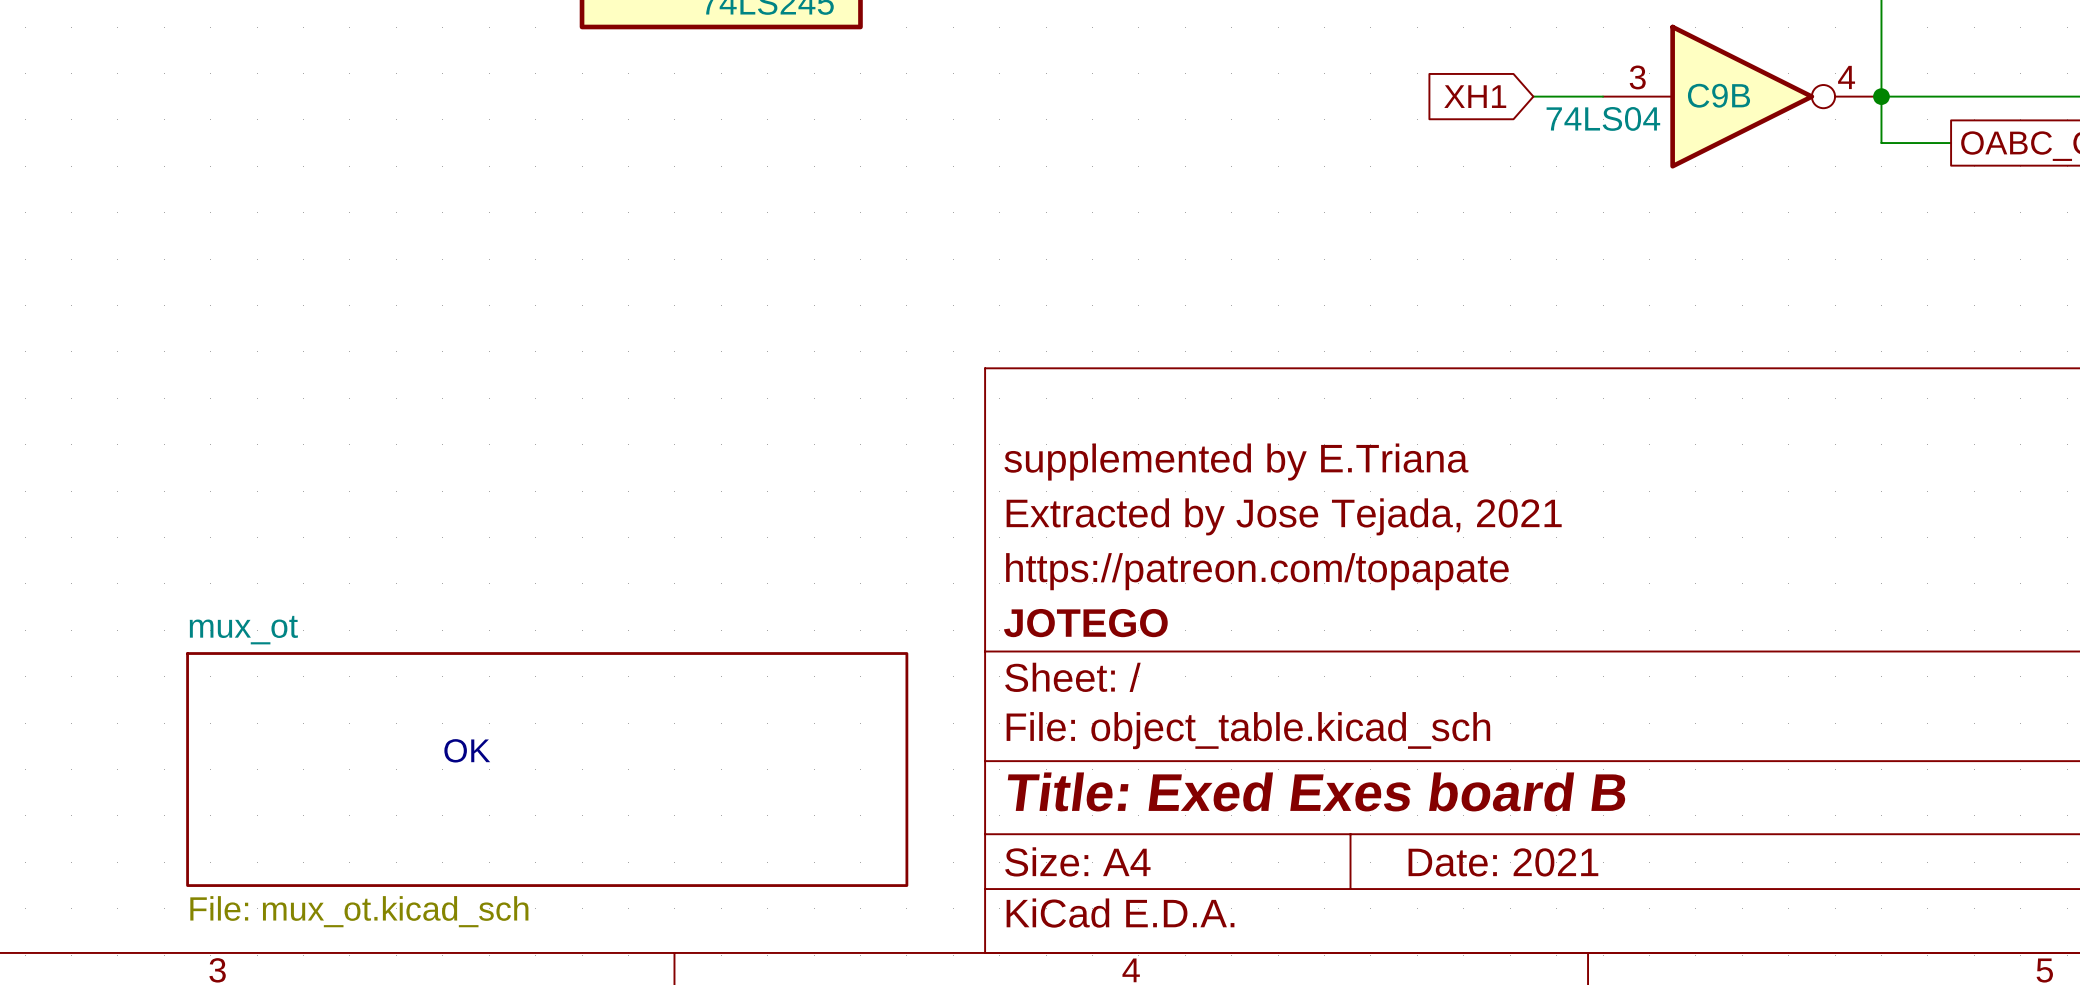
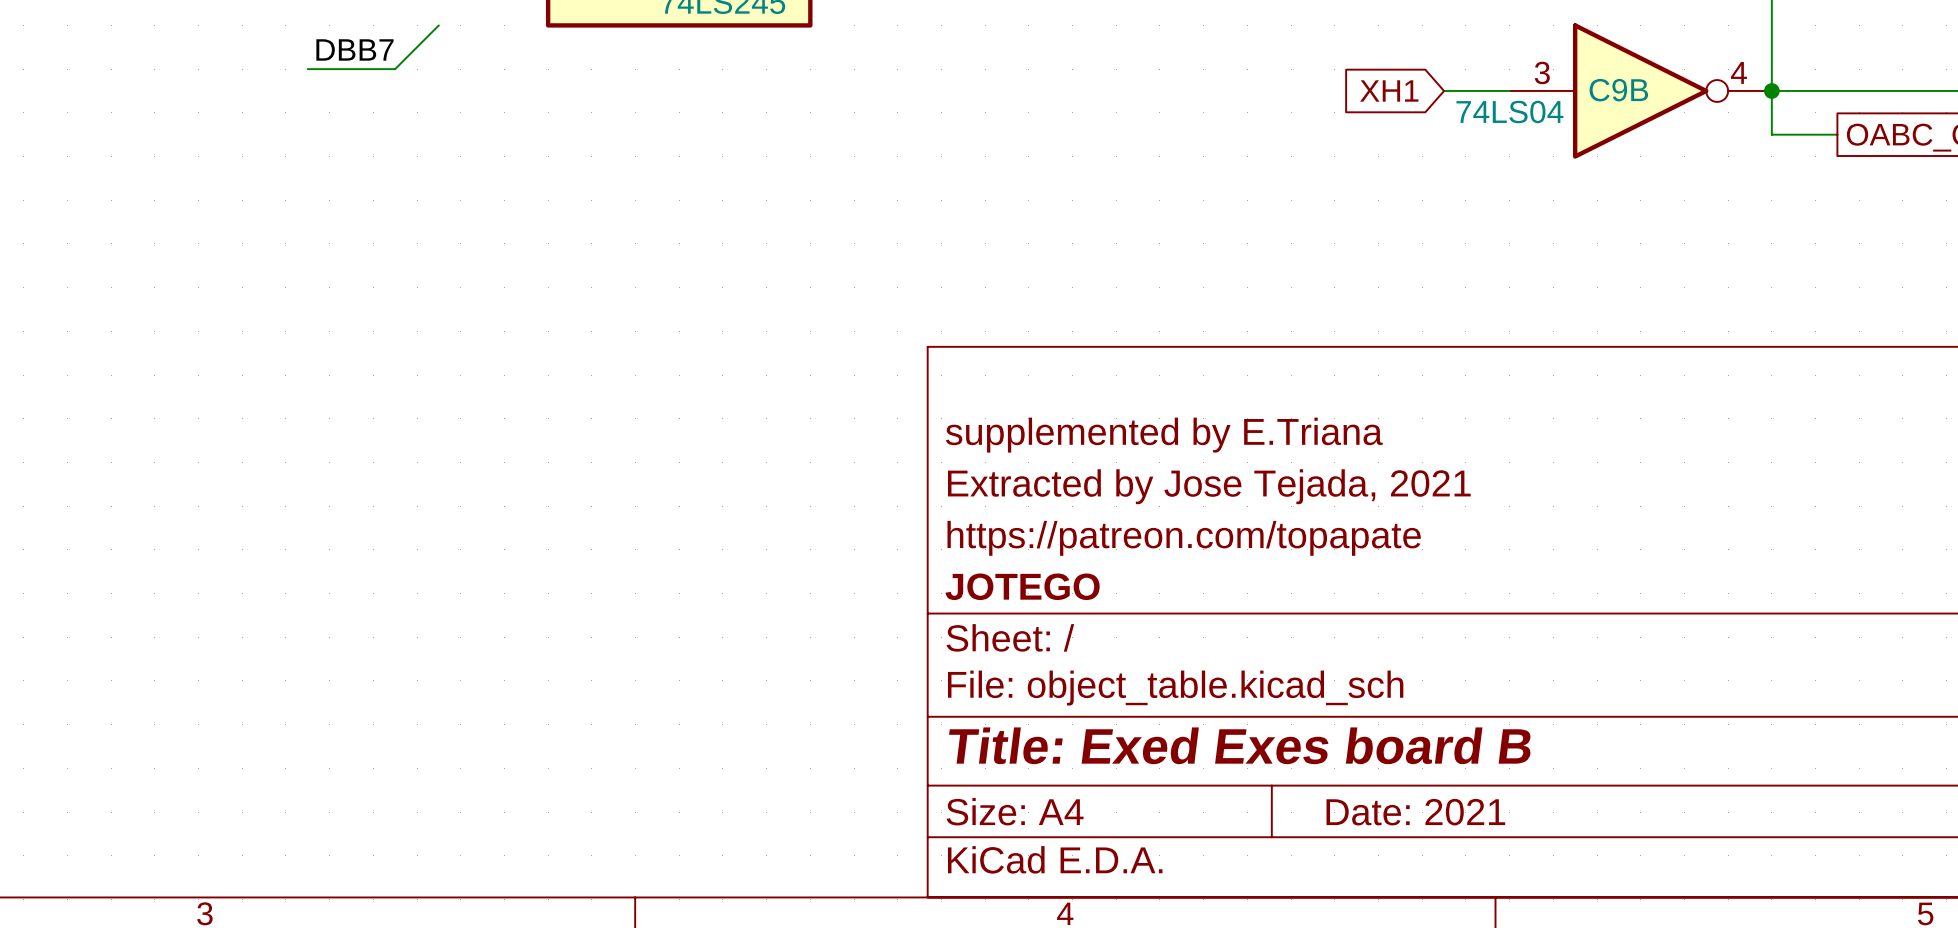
wire: none -> (438, 25) (395, 69) (307, 69)
label: none -> DBB7 (354, 49)
text: OK (467, 750) -> none
sheet mux_ot: File: mux_ot.kicad_sch (547, 769) -> none

